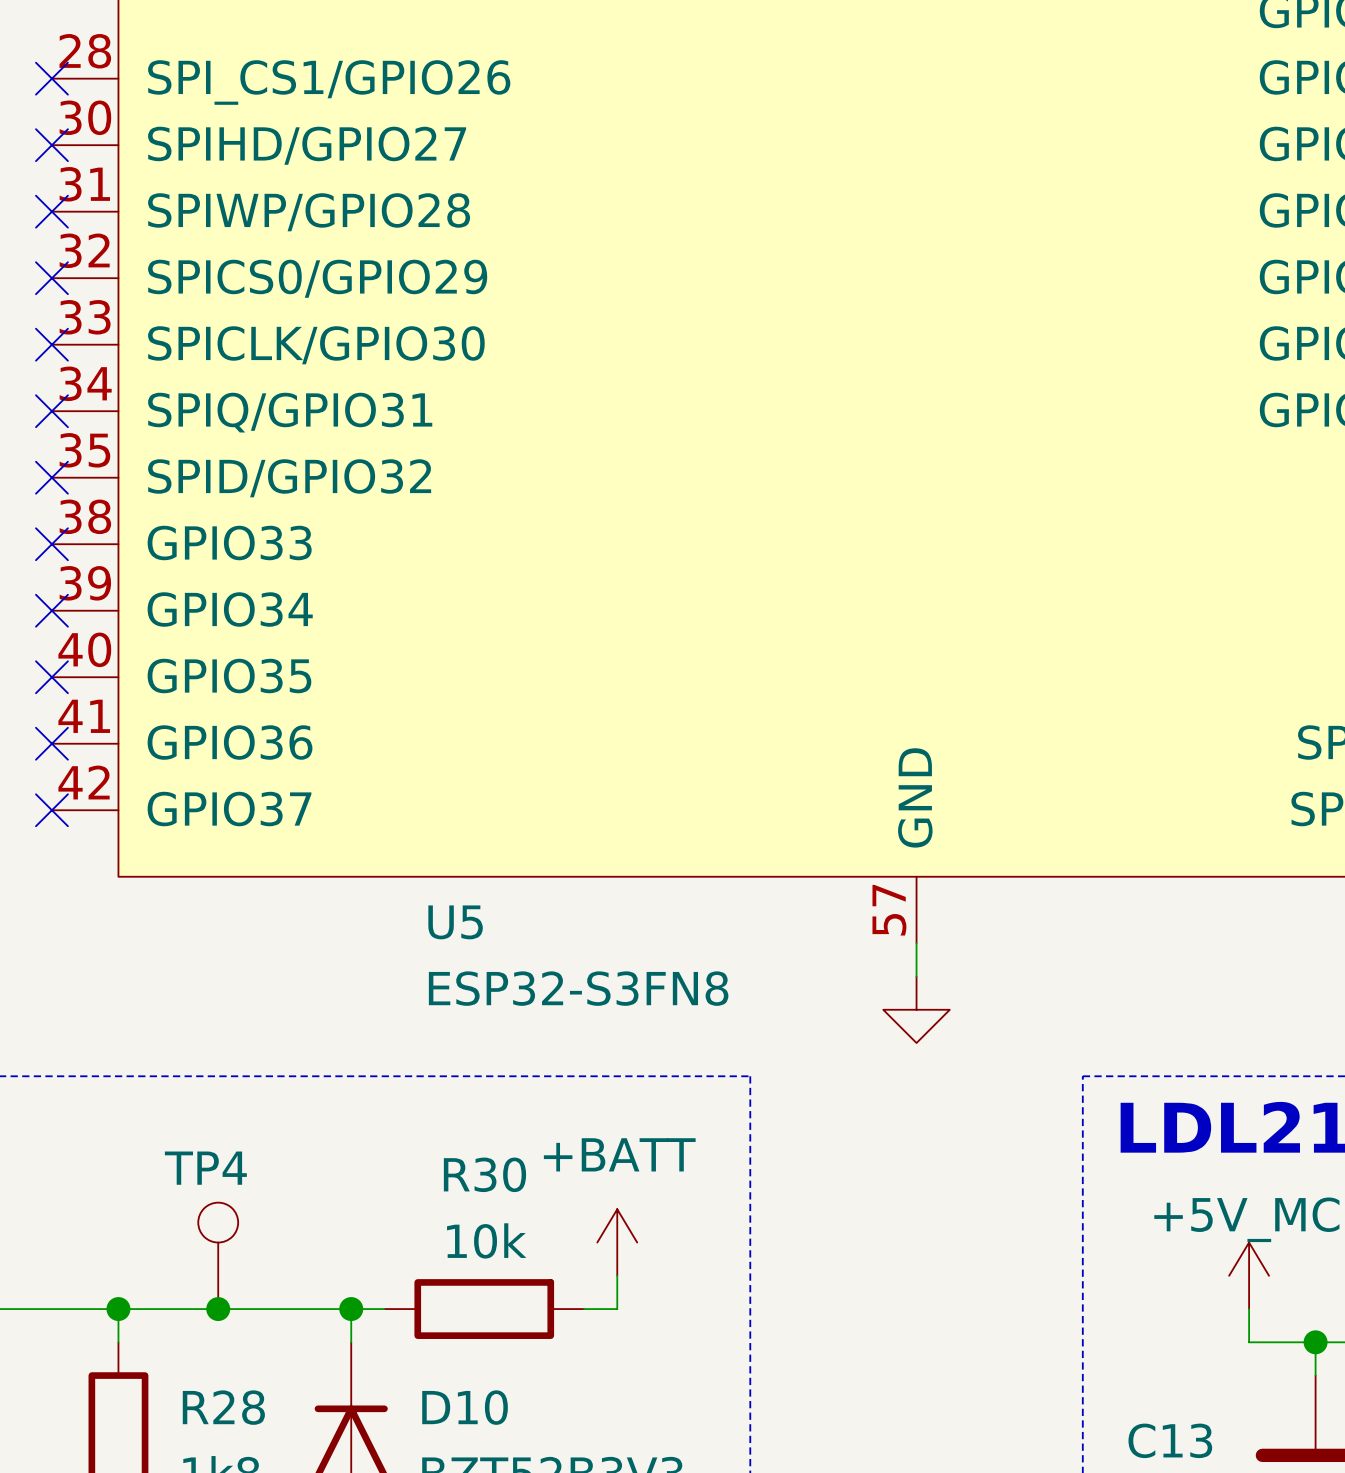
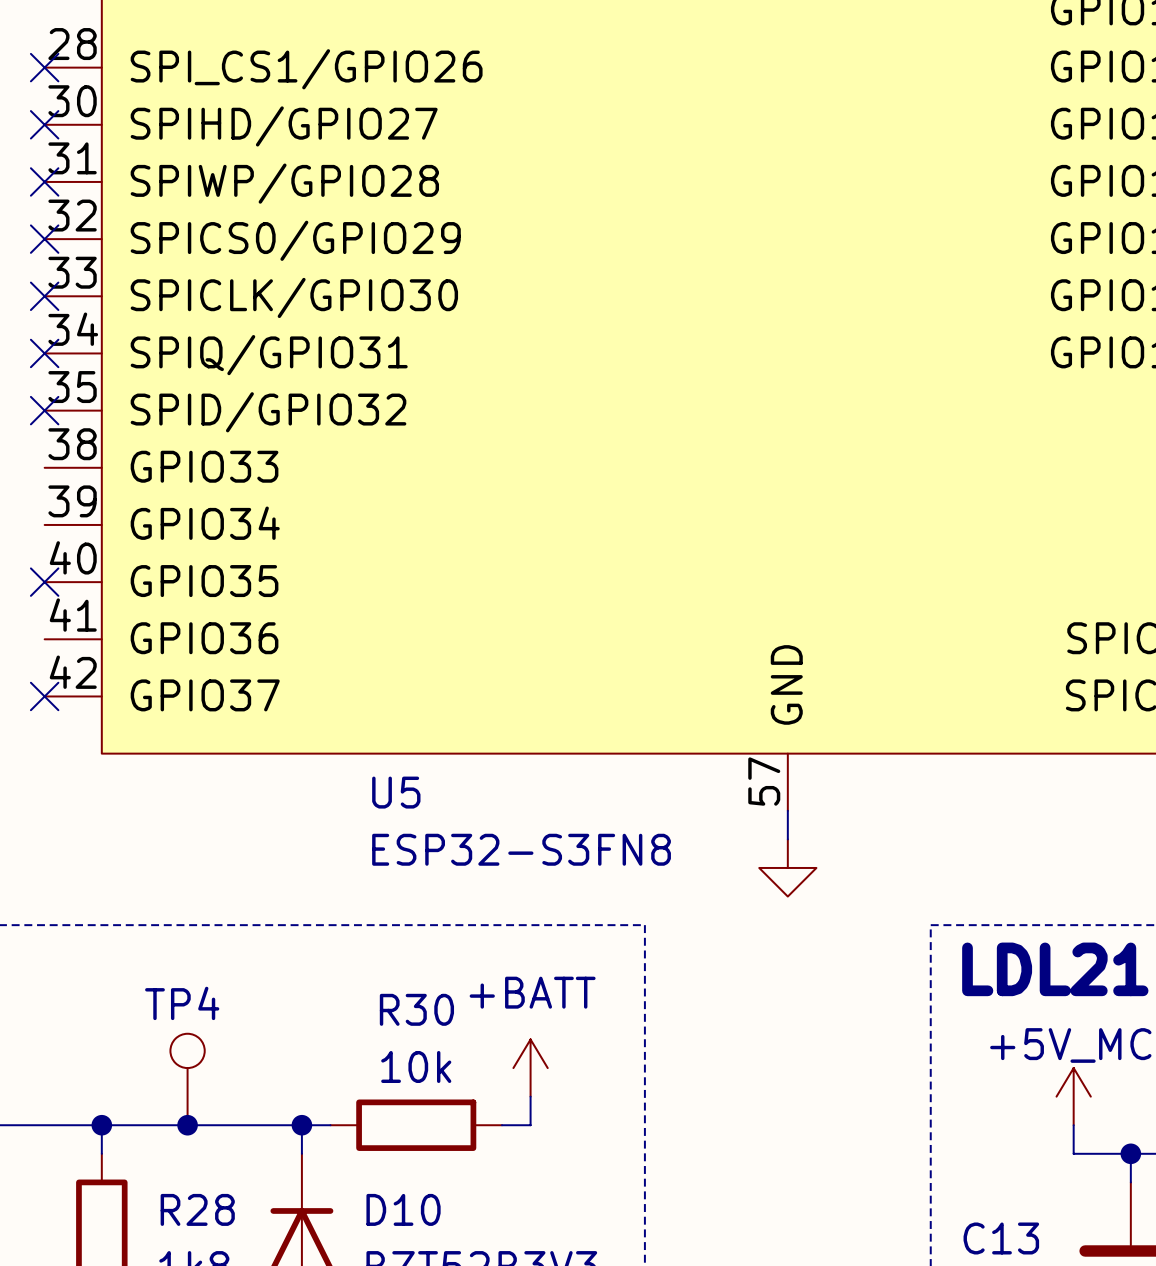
no-connect mark: (51, 544) -> none
no-connect mark: (51, 610) -> none
no-connect mark: (51, 743) -> none

